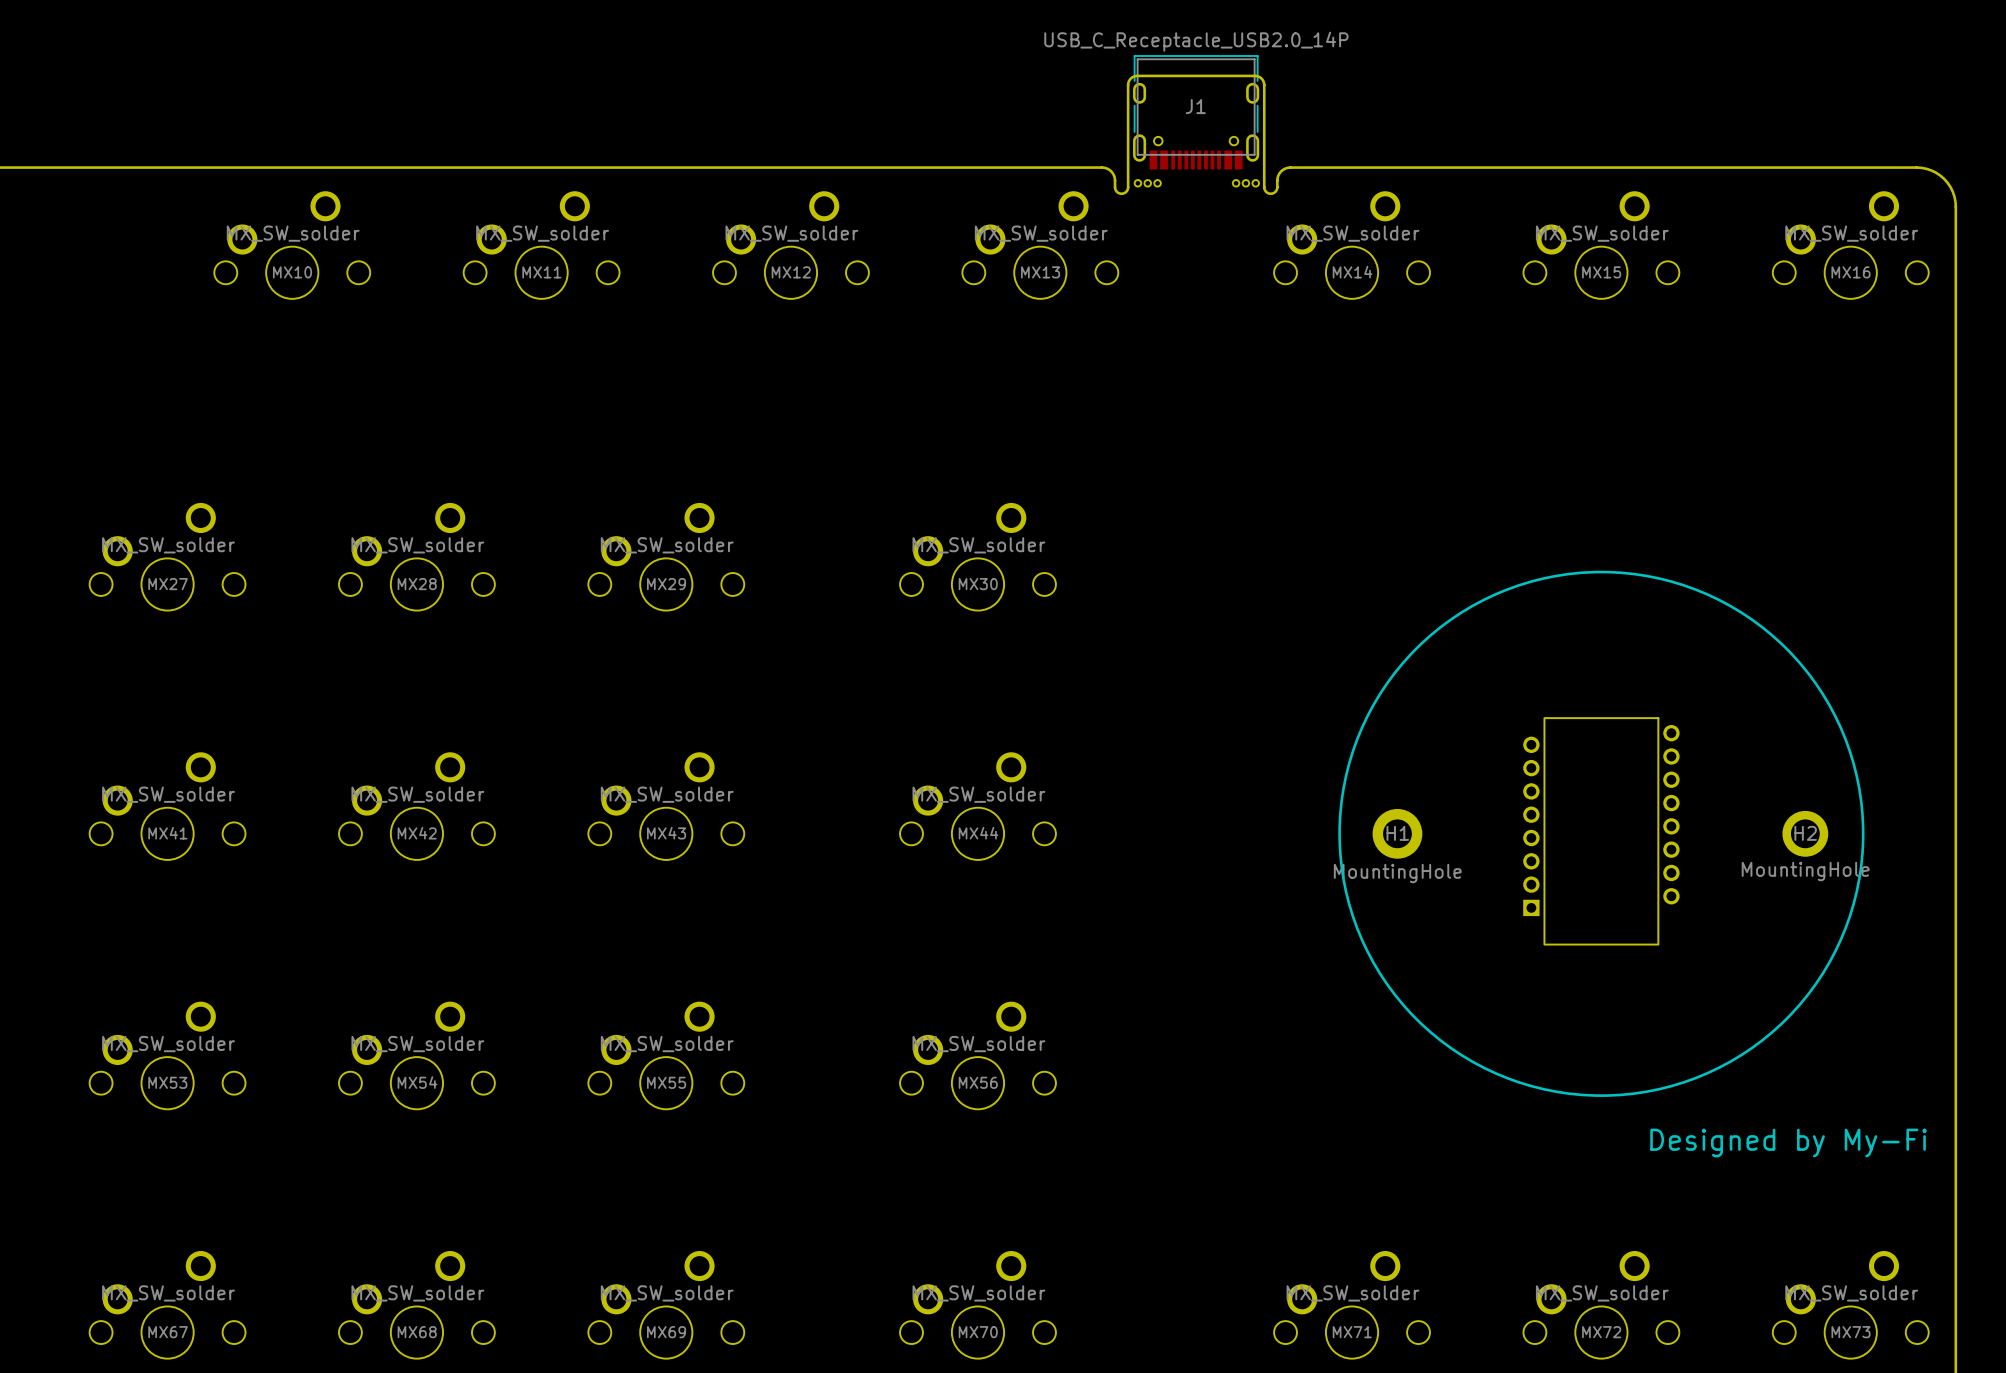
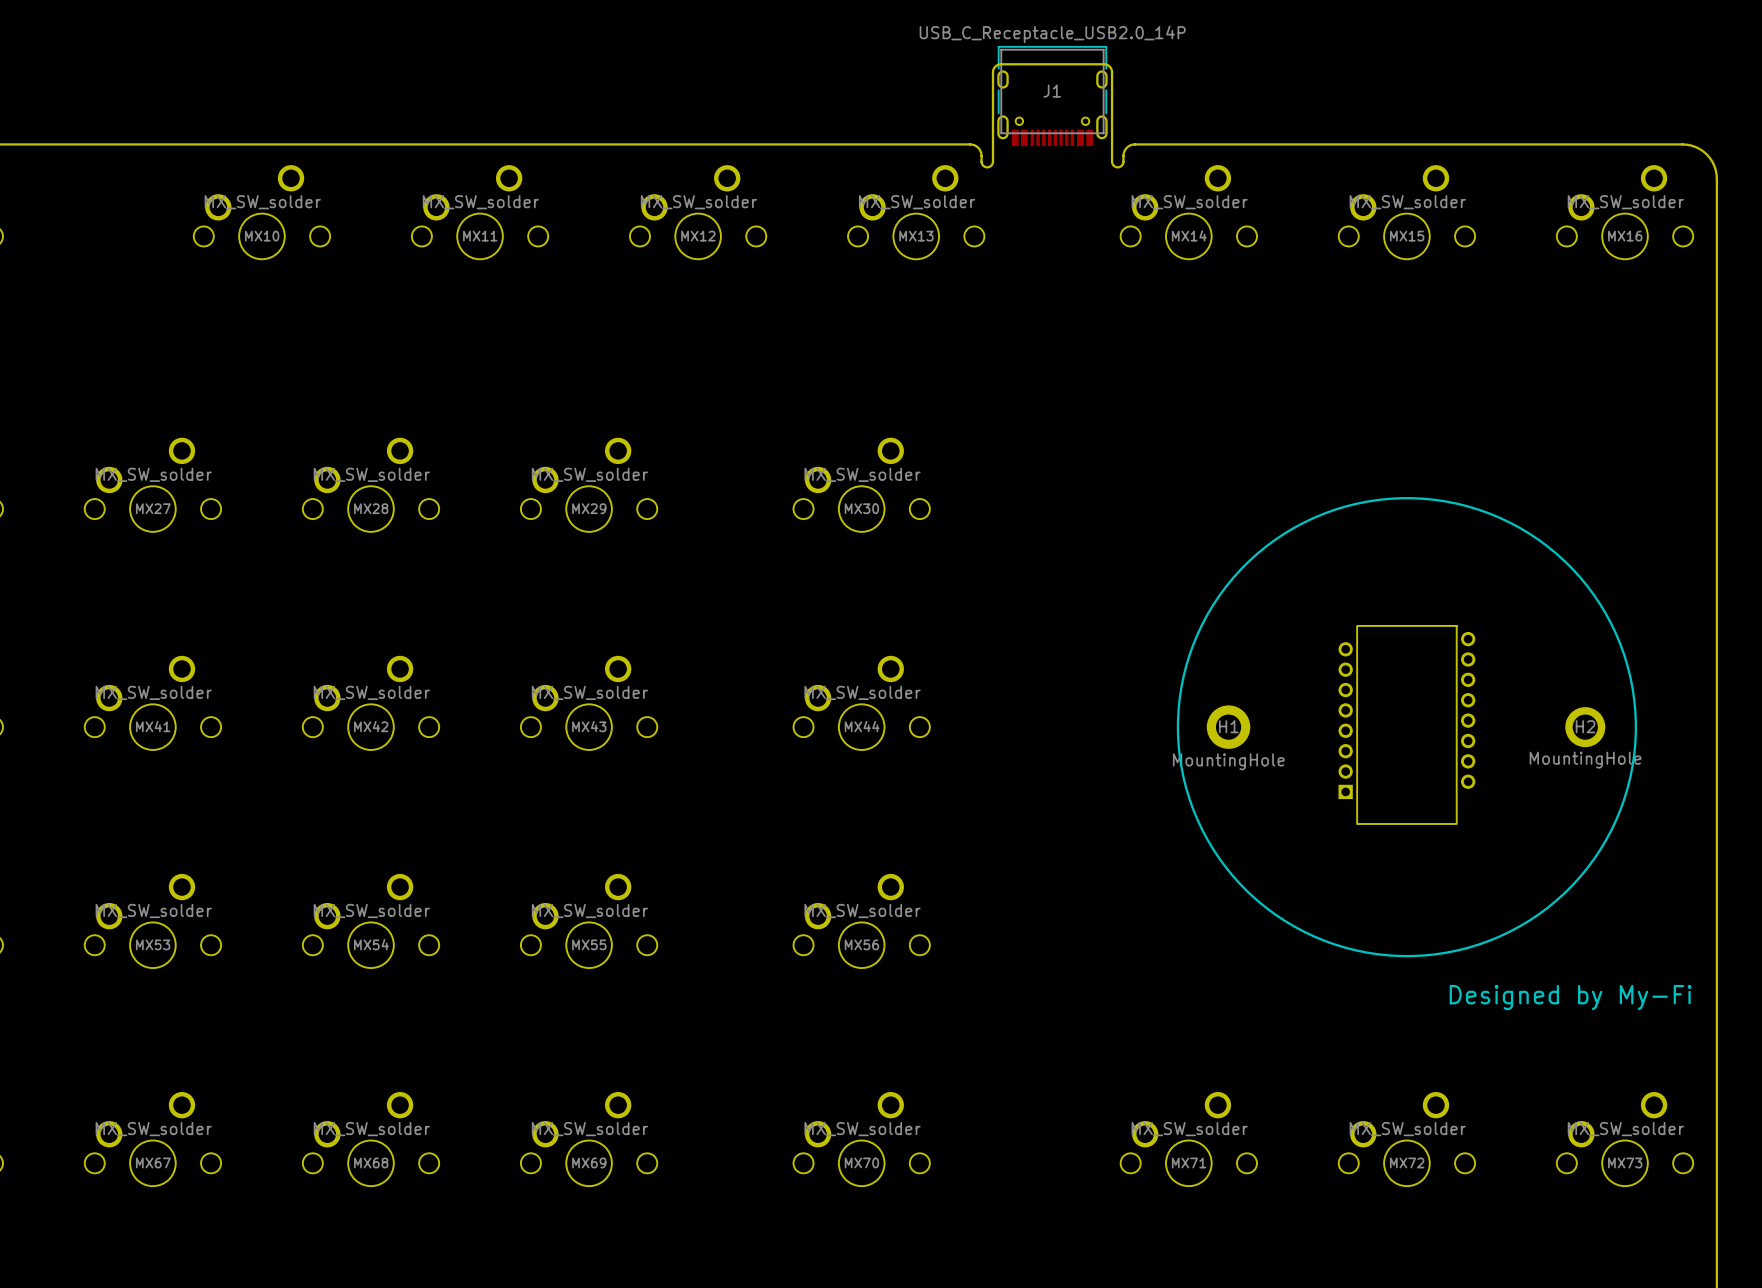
part: (1147, 183) -> none
part: (1245, 183) -> none

